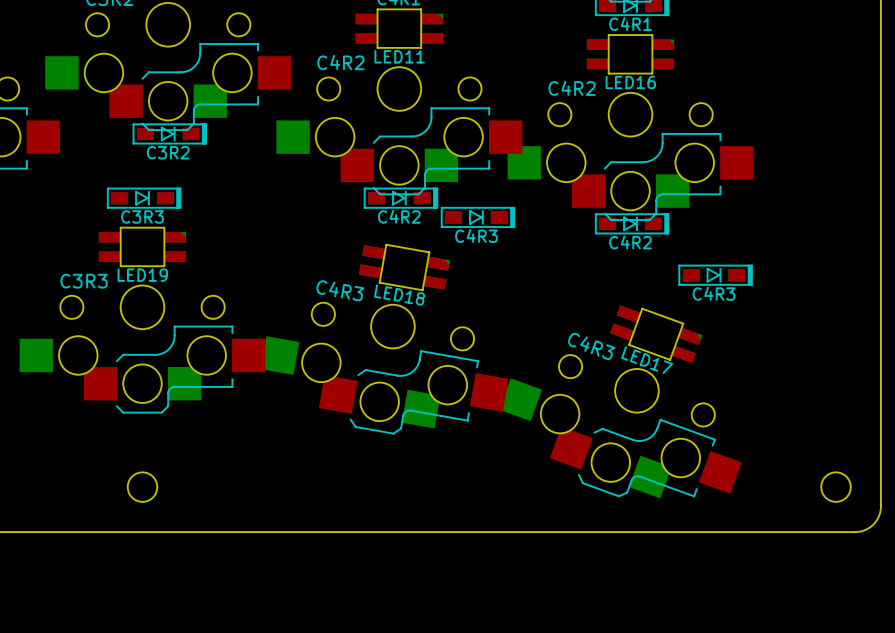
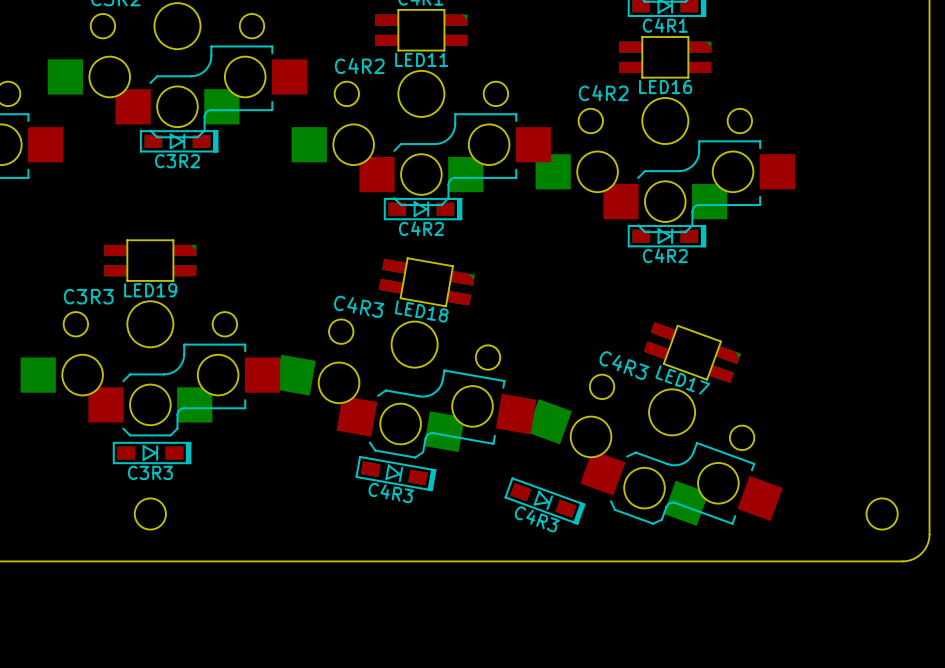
part position: (144, 198) -> (152, 453)
part: (478, 217) -> none
part: (715, 275) -> none
part: none -> (395, 473)
part: none -> (544, 501)

